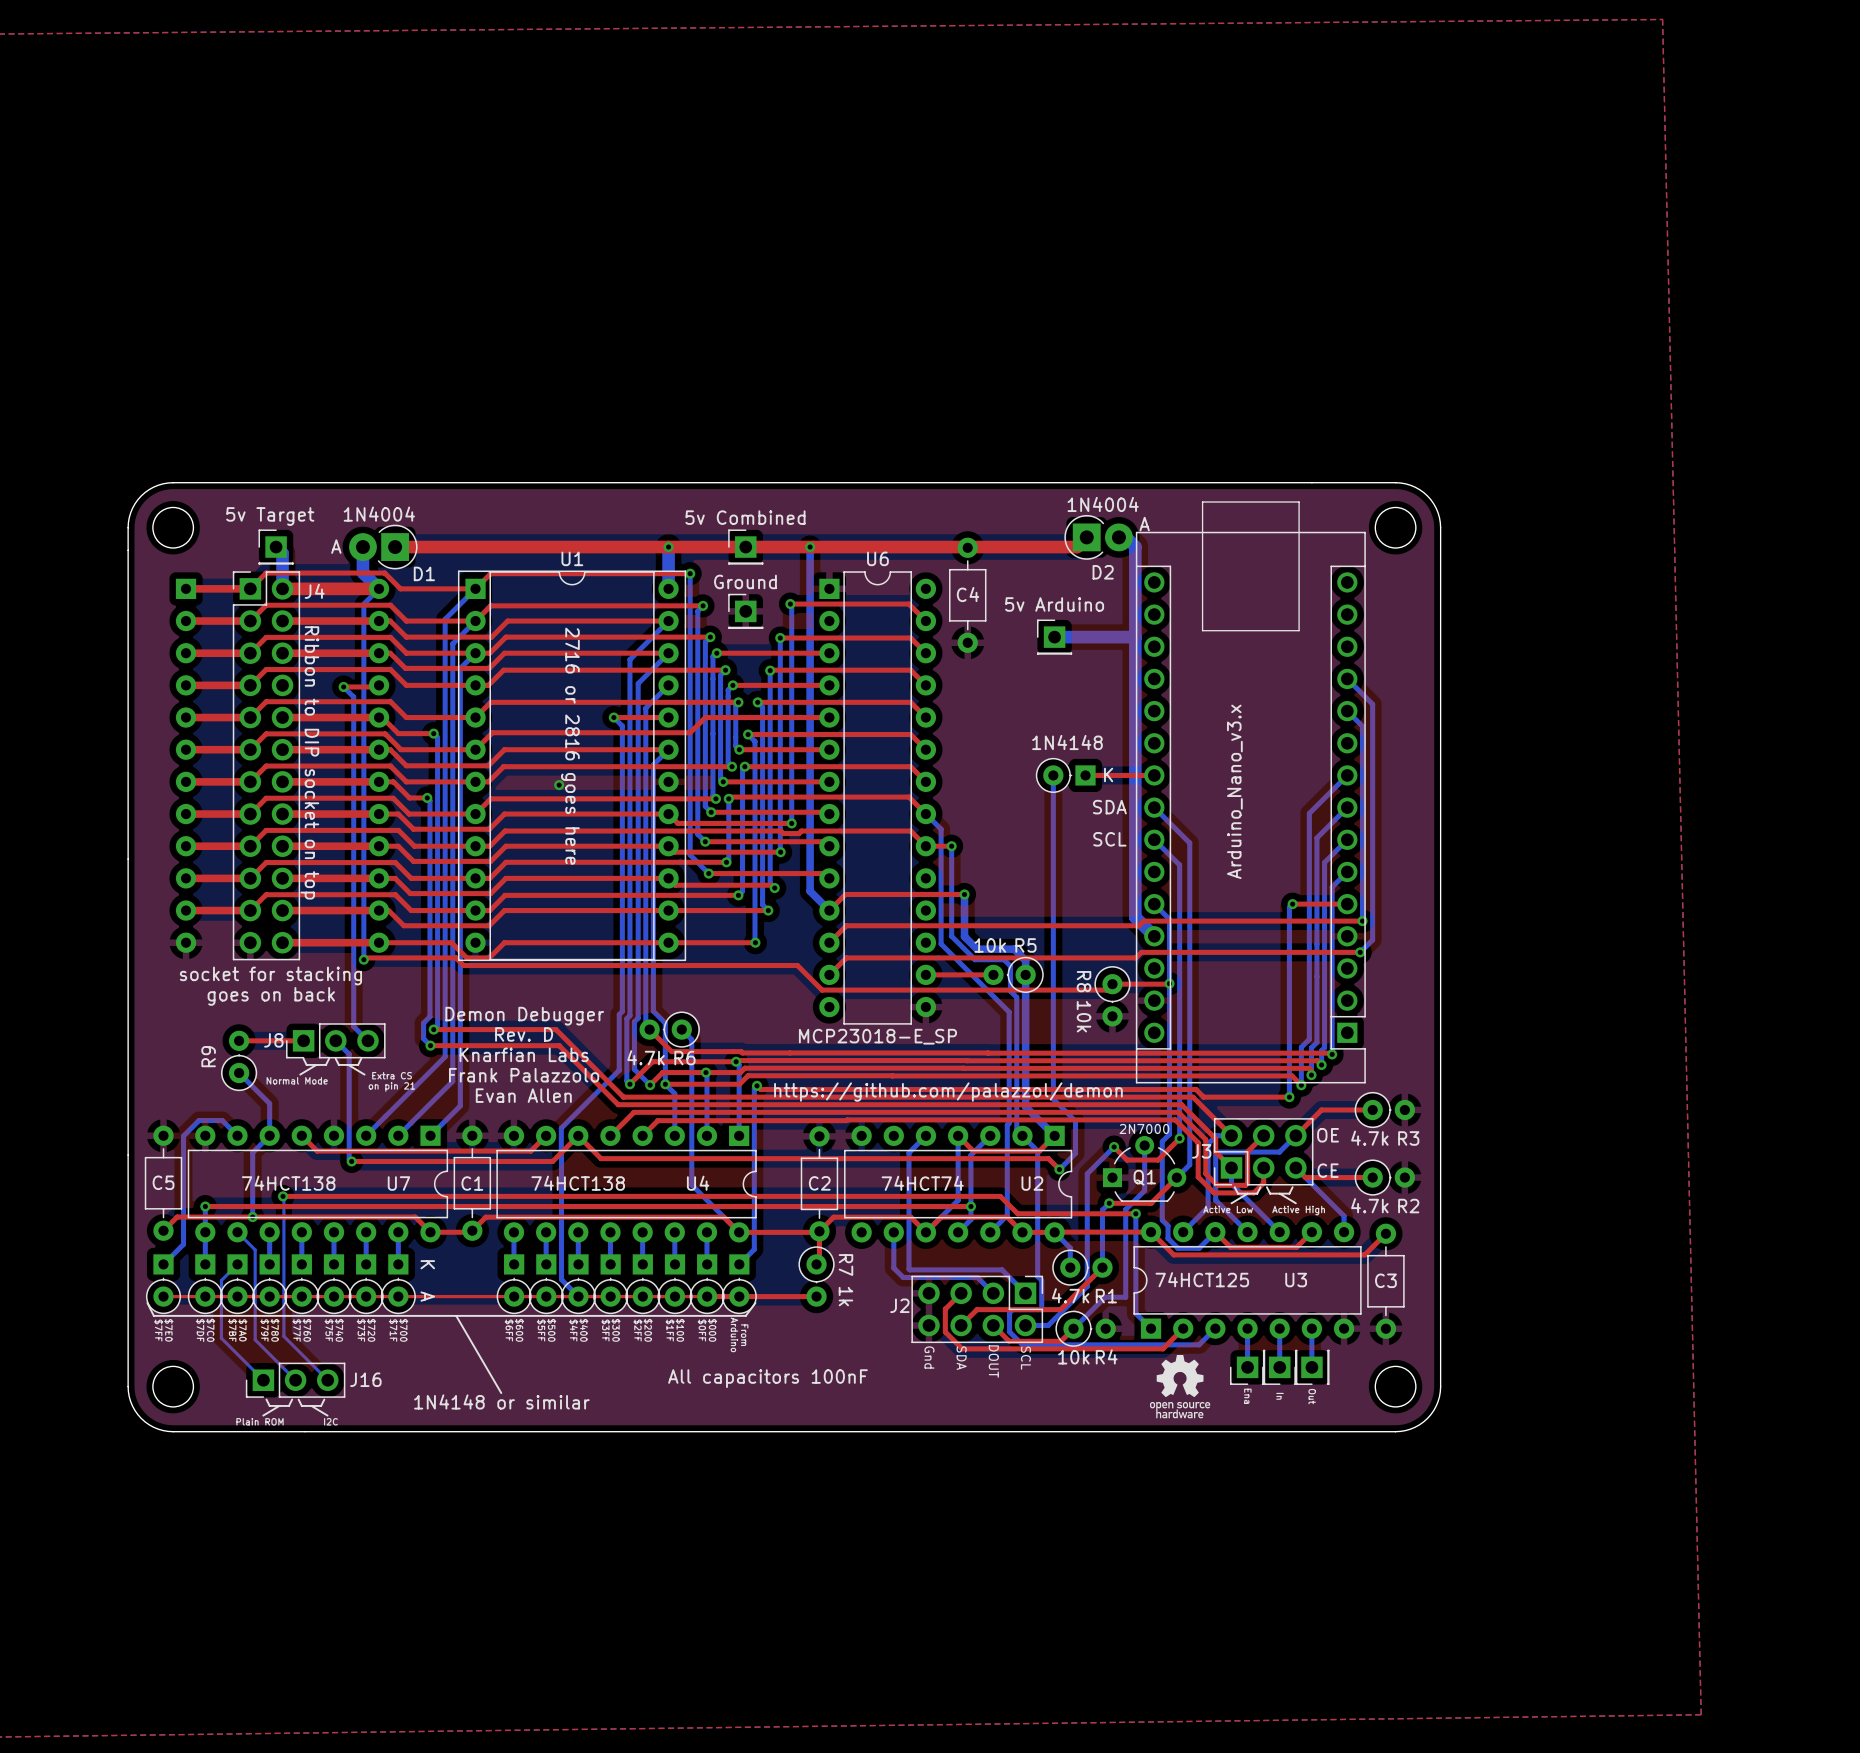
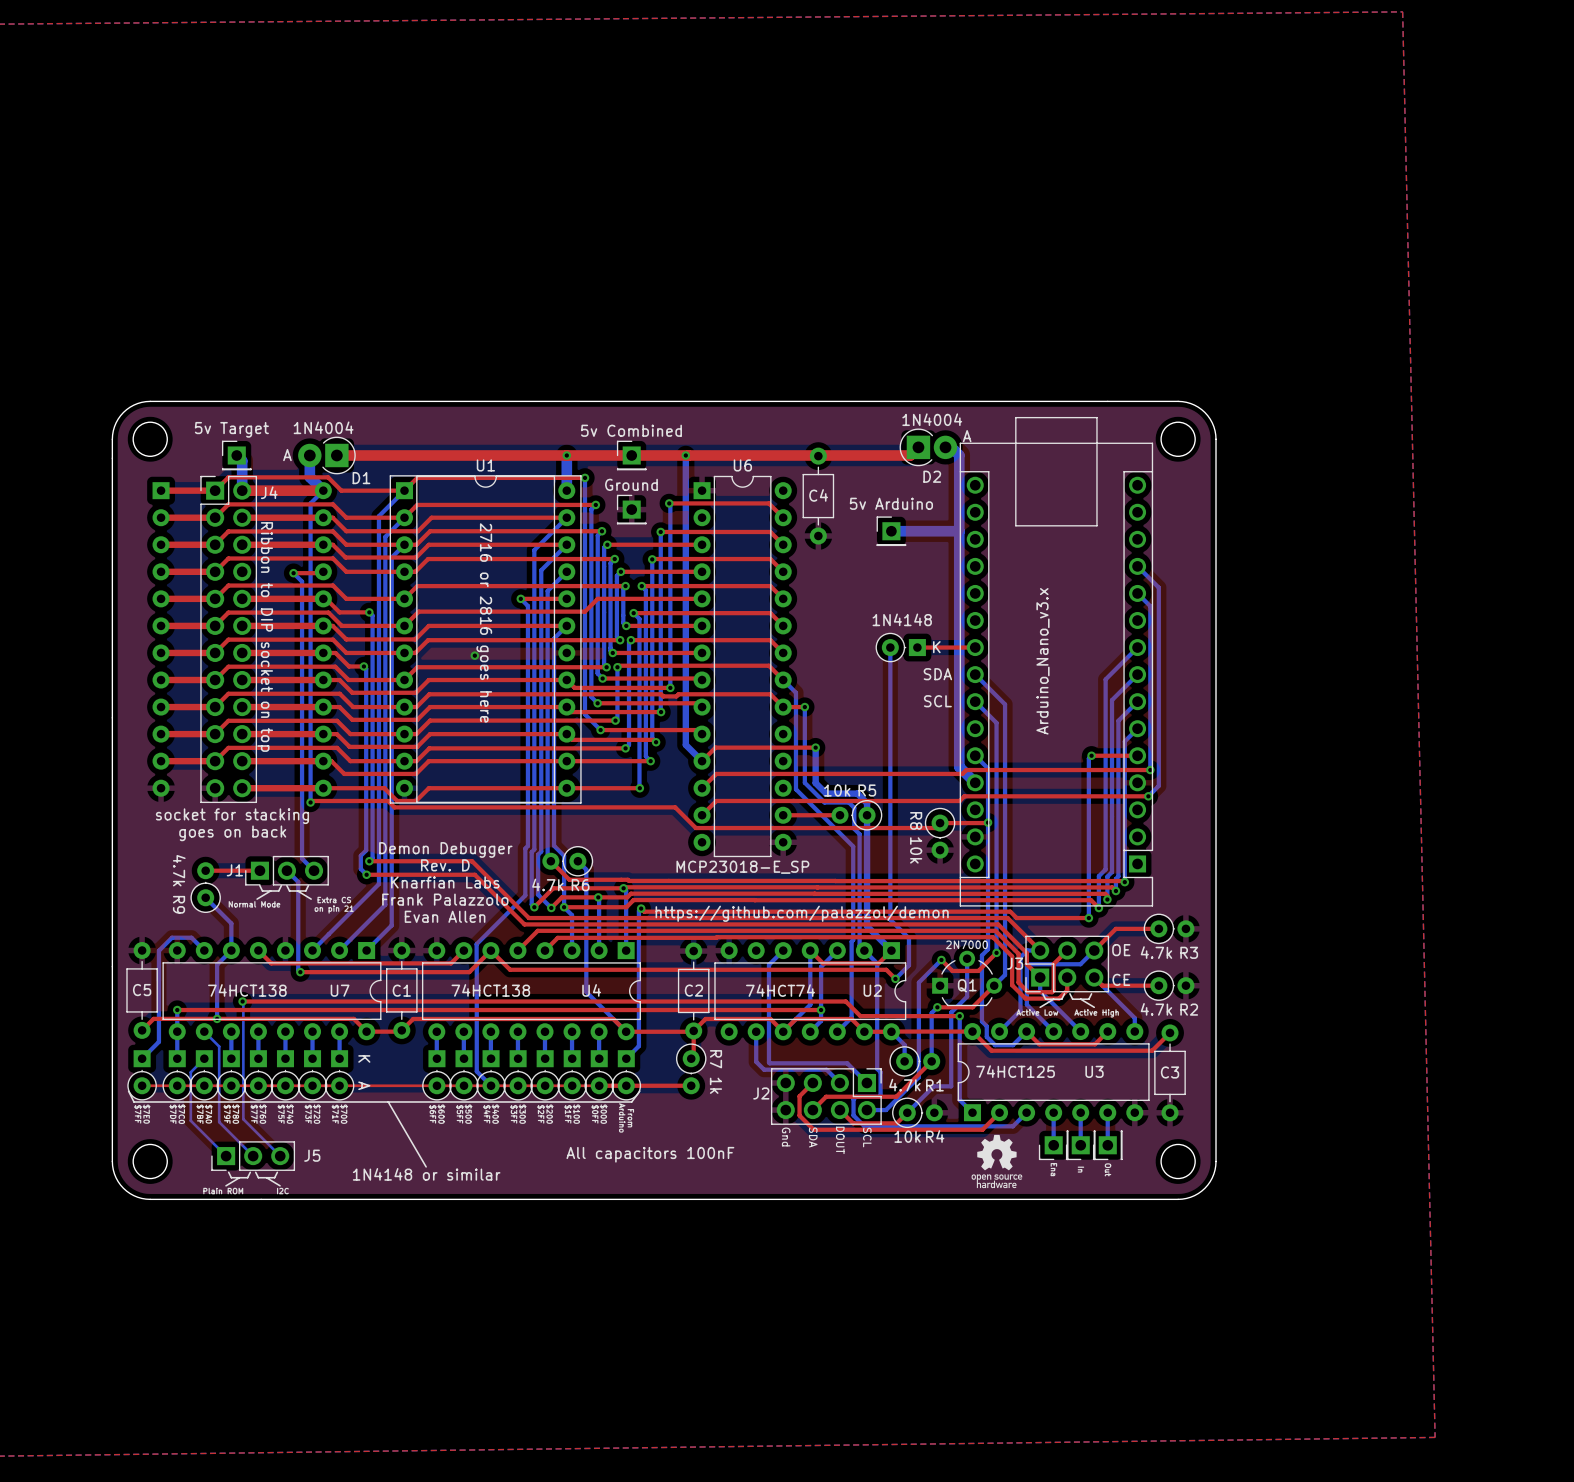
text: none -> 4.7k (179, 870)
J8 name: J8 (273, 1040) -> J1 (234, 870)
R9 name rotation: 0° (208, 1056) -> 180° (179, 904)
J16 name: J16 (365, 1379) -> J5 (312, 1155)

